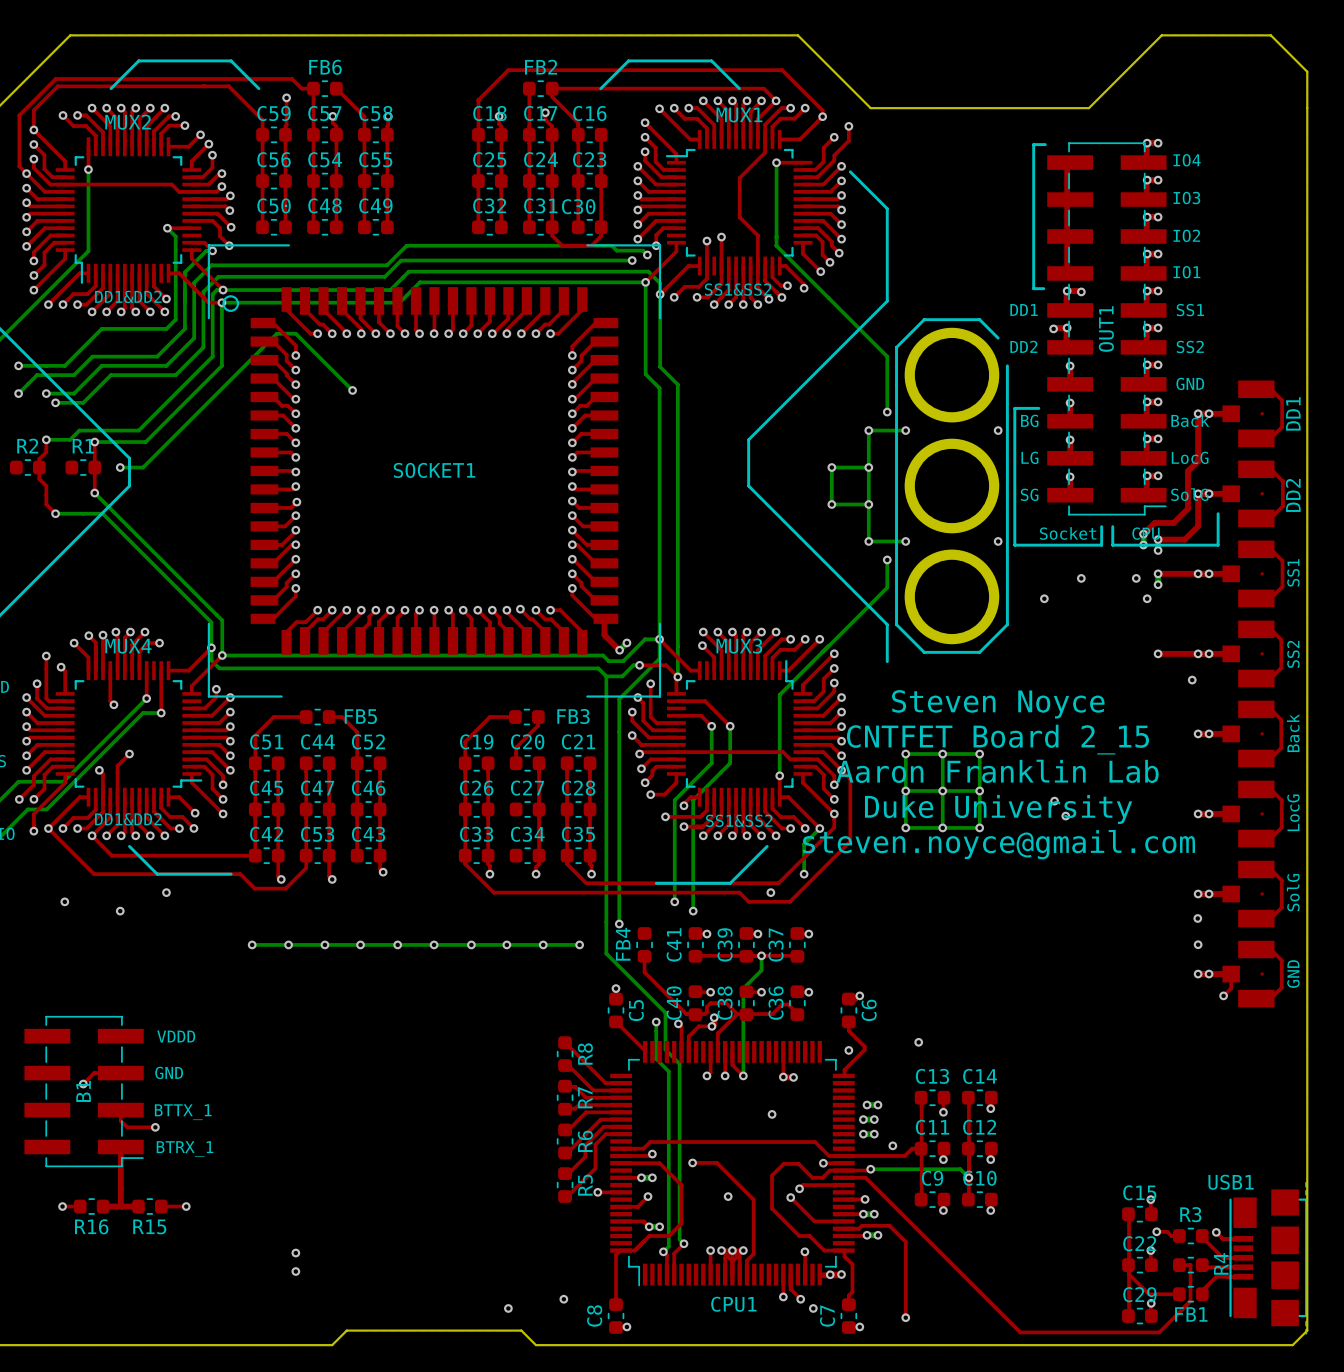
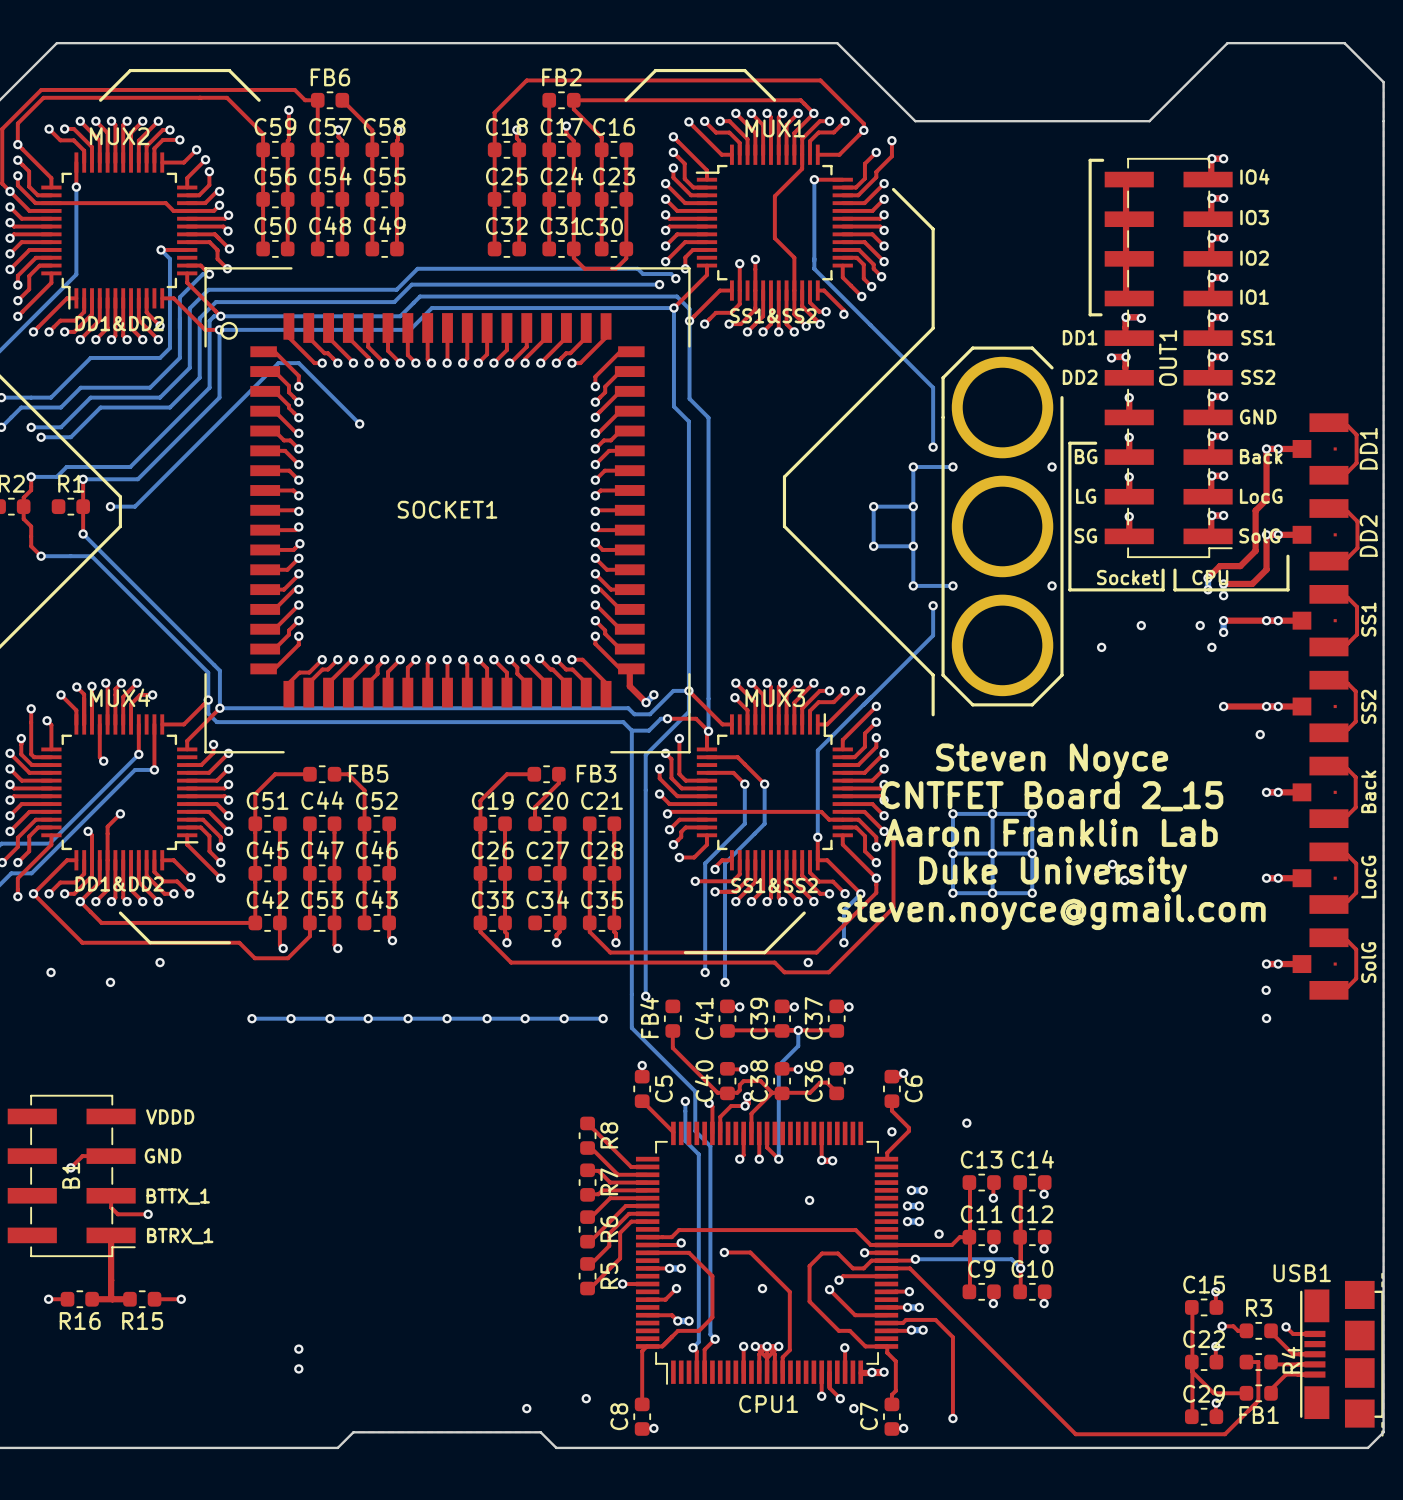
top track: (1256, 949) (1254, 952) (1273, 952) (1281, 960) (1281, 987) (1273, 995) (1254, 995) (1256, 998) -> none
top track: (1198, 974) (1231, 974) (1231, 988) (1223, 995) -> none
via: (1198, 974) -> none
via: (1209, 974) -> none
part: (1248, 974) -> none
text: GND (1293, 974) -> none
via: (1223, 995) -> none

